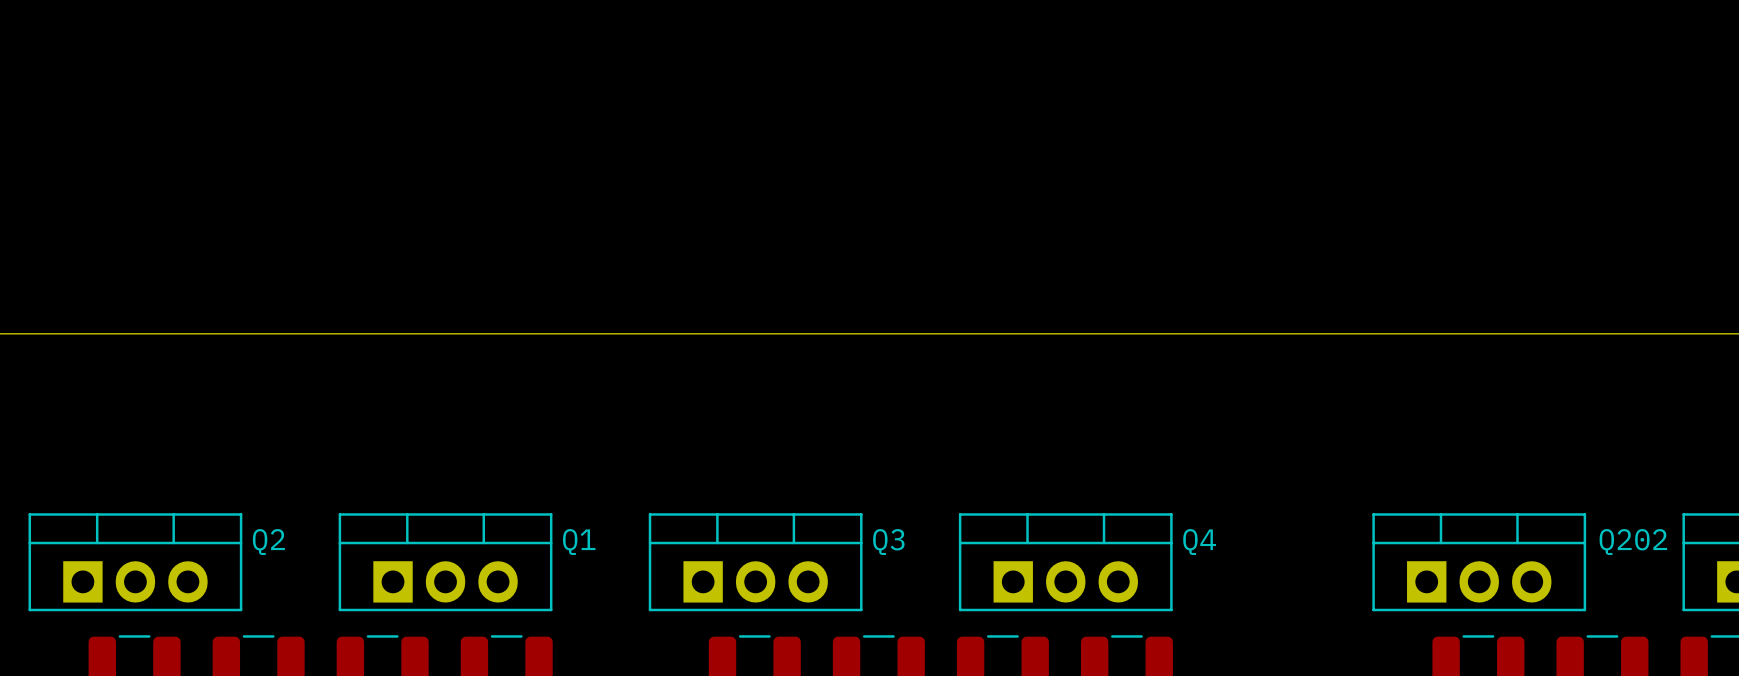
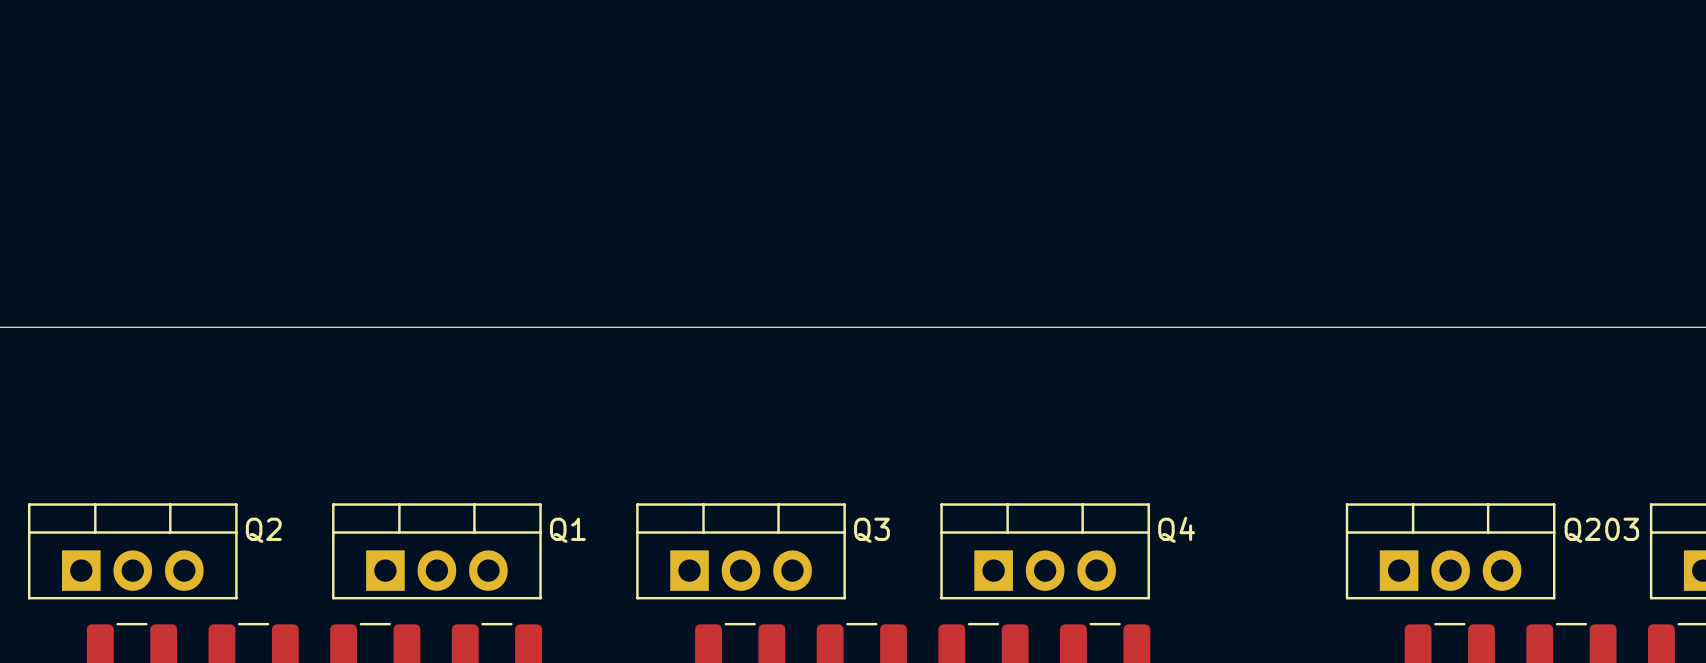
Q202 name: Q202 (1633, 542) -> Q203 (1601, 530)

